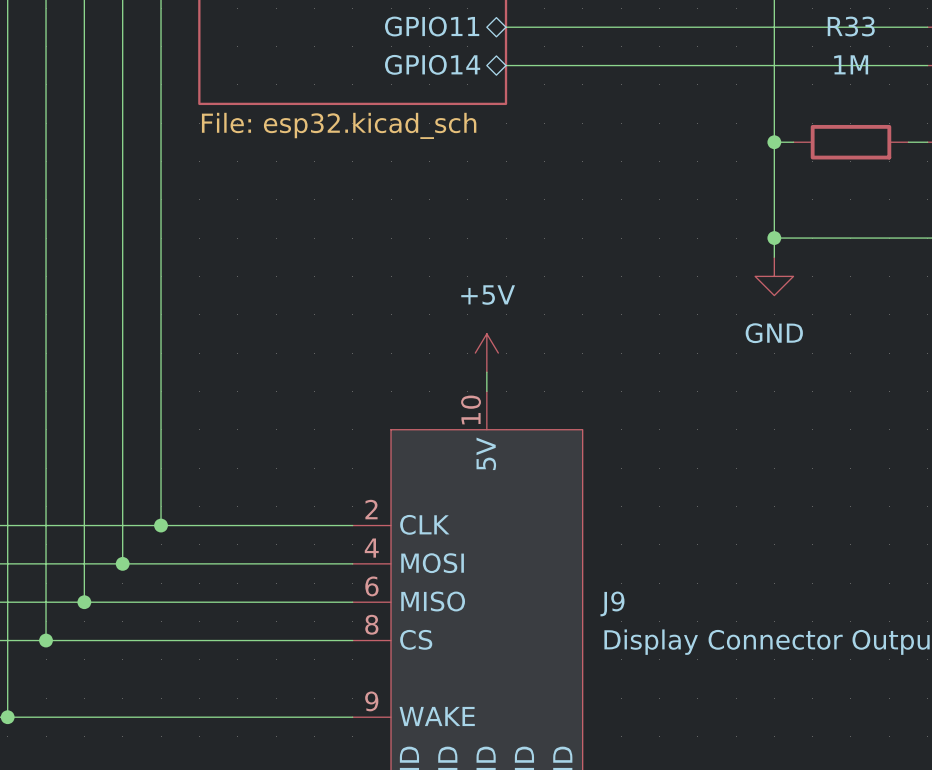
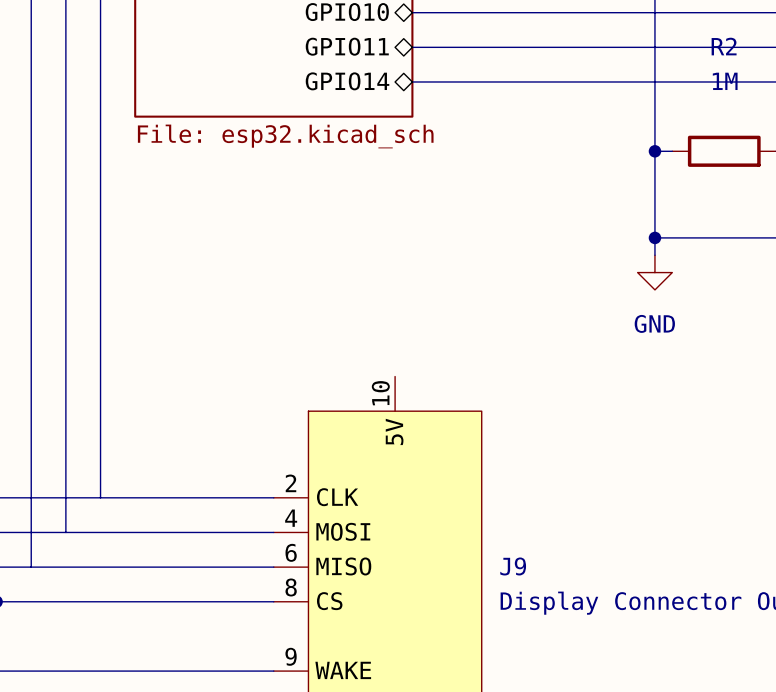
R33 name: R33 (851, 26) -> R2 (724, 46)
power symbol: +5V (486, 353) -> none
wire: (486, 372) (486, 391) -> none
junction: (161, 525) -> none
junction: (122, 563) -> none
junction: (84, 602) -> none

